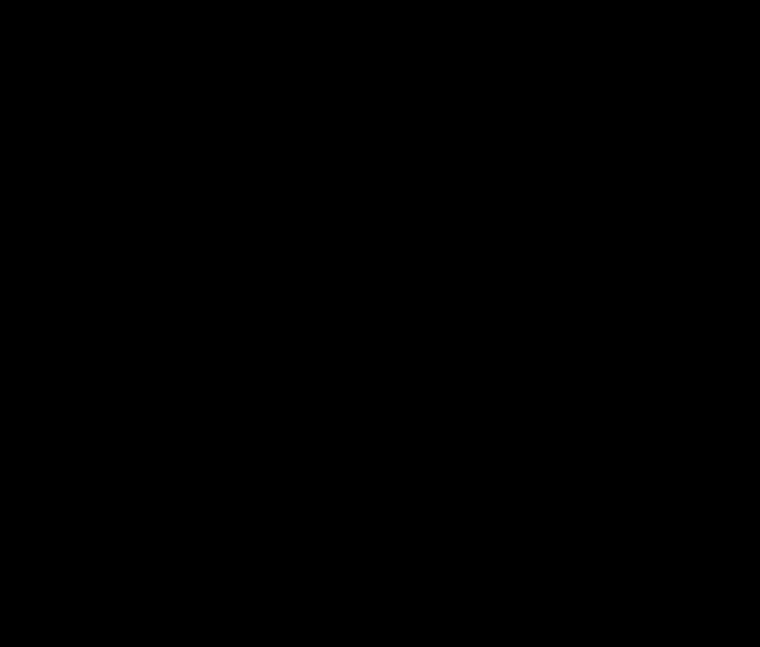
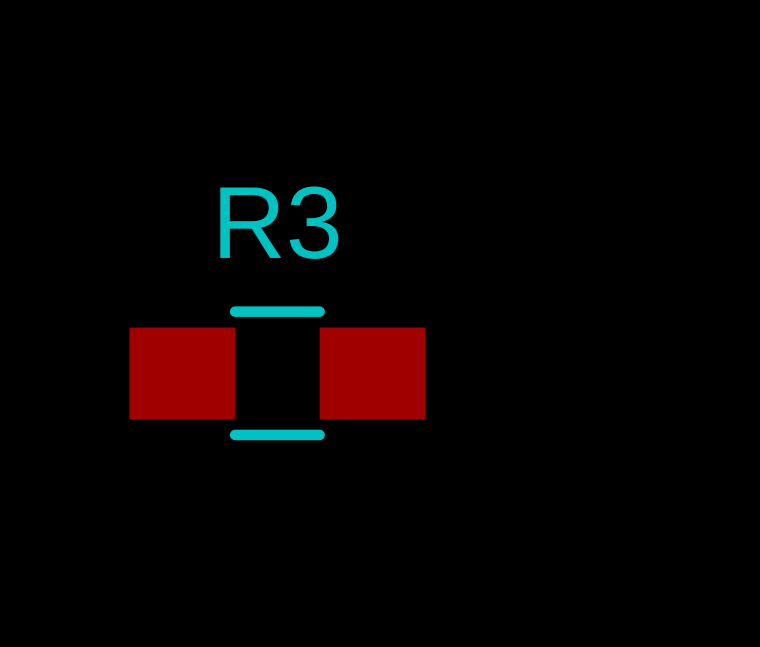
R3: none -> (277, 373)

